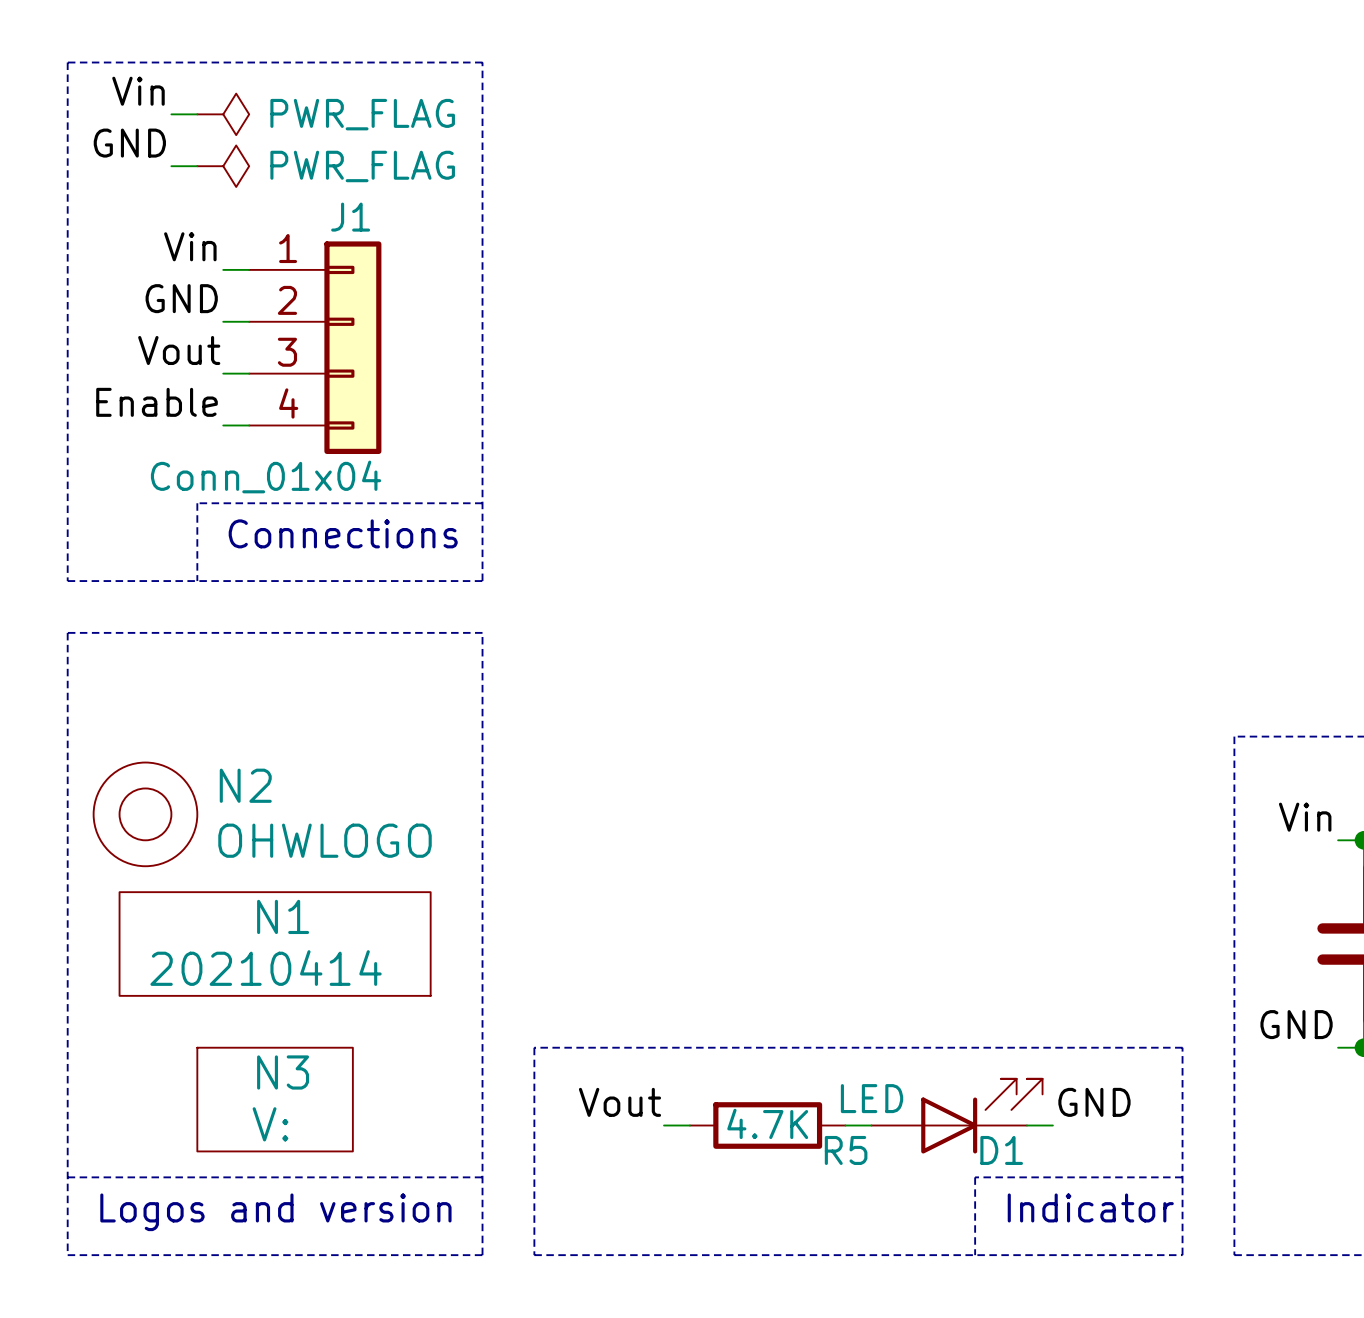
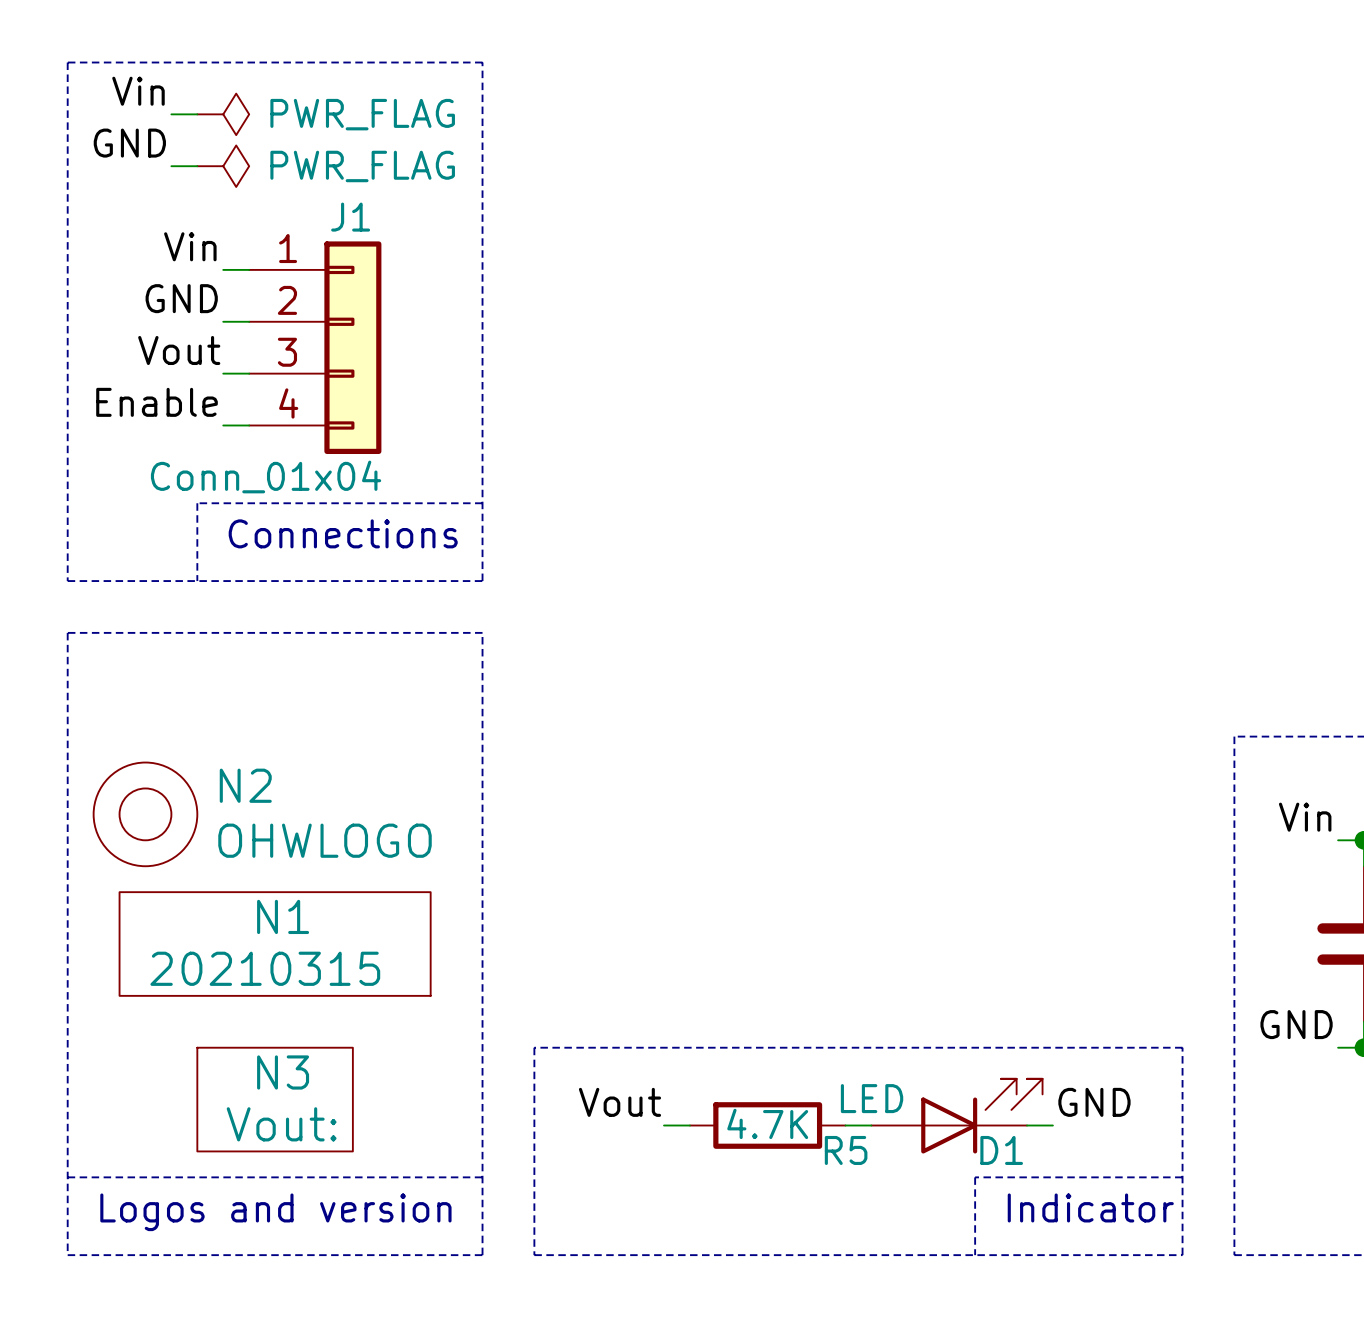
N1 value: 20210414 (266, 968) -> 20210315 (265, 968)
N3 value: V: (270, 1124) -> Vout: (281, 1124)

